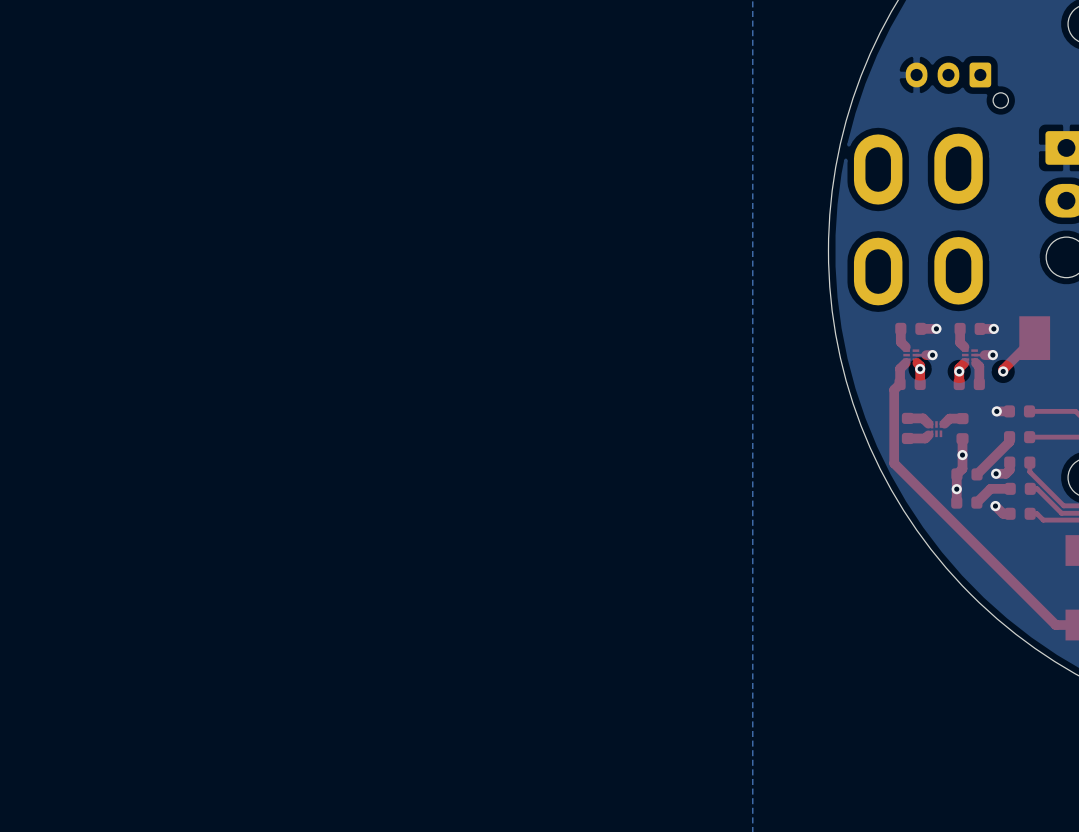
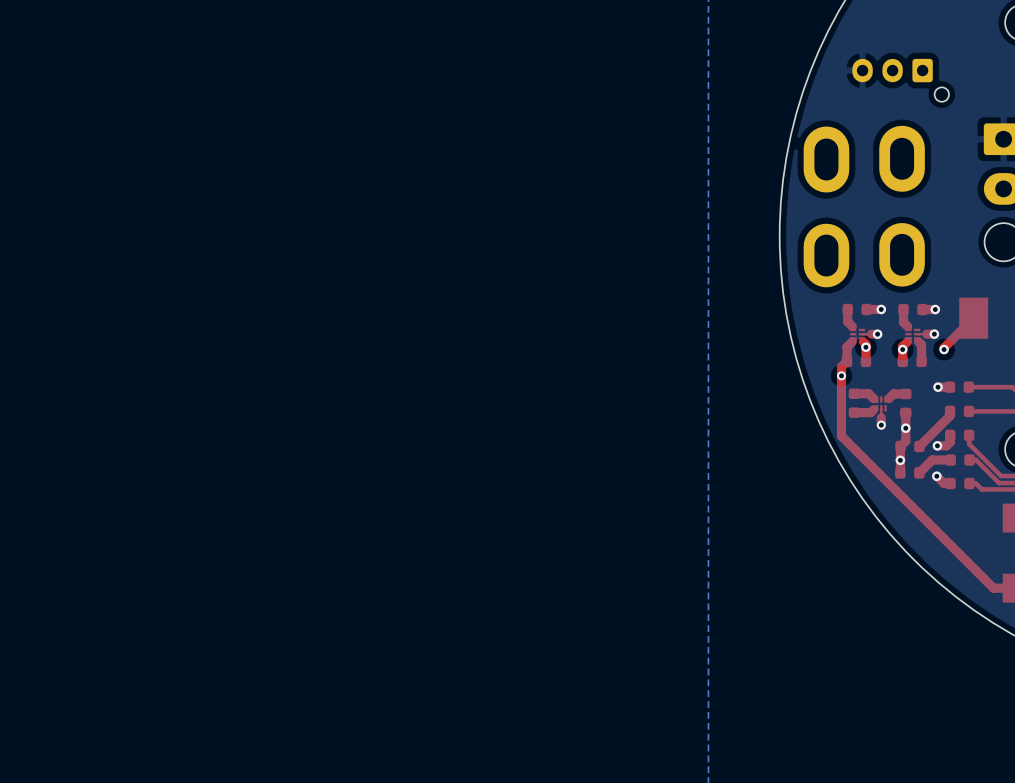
via: none -> (841, 375)
top track: none -> (881, 417) (881, 425)
via: none -> (881, 425)

